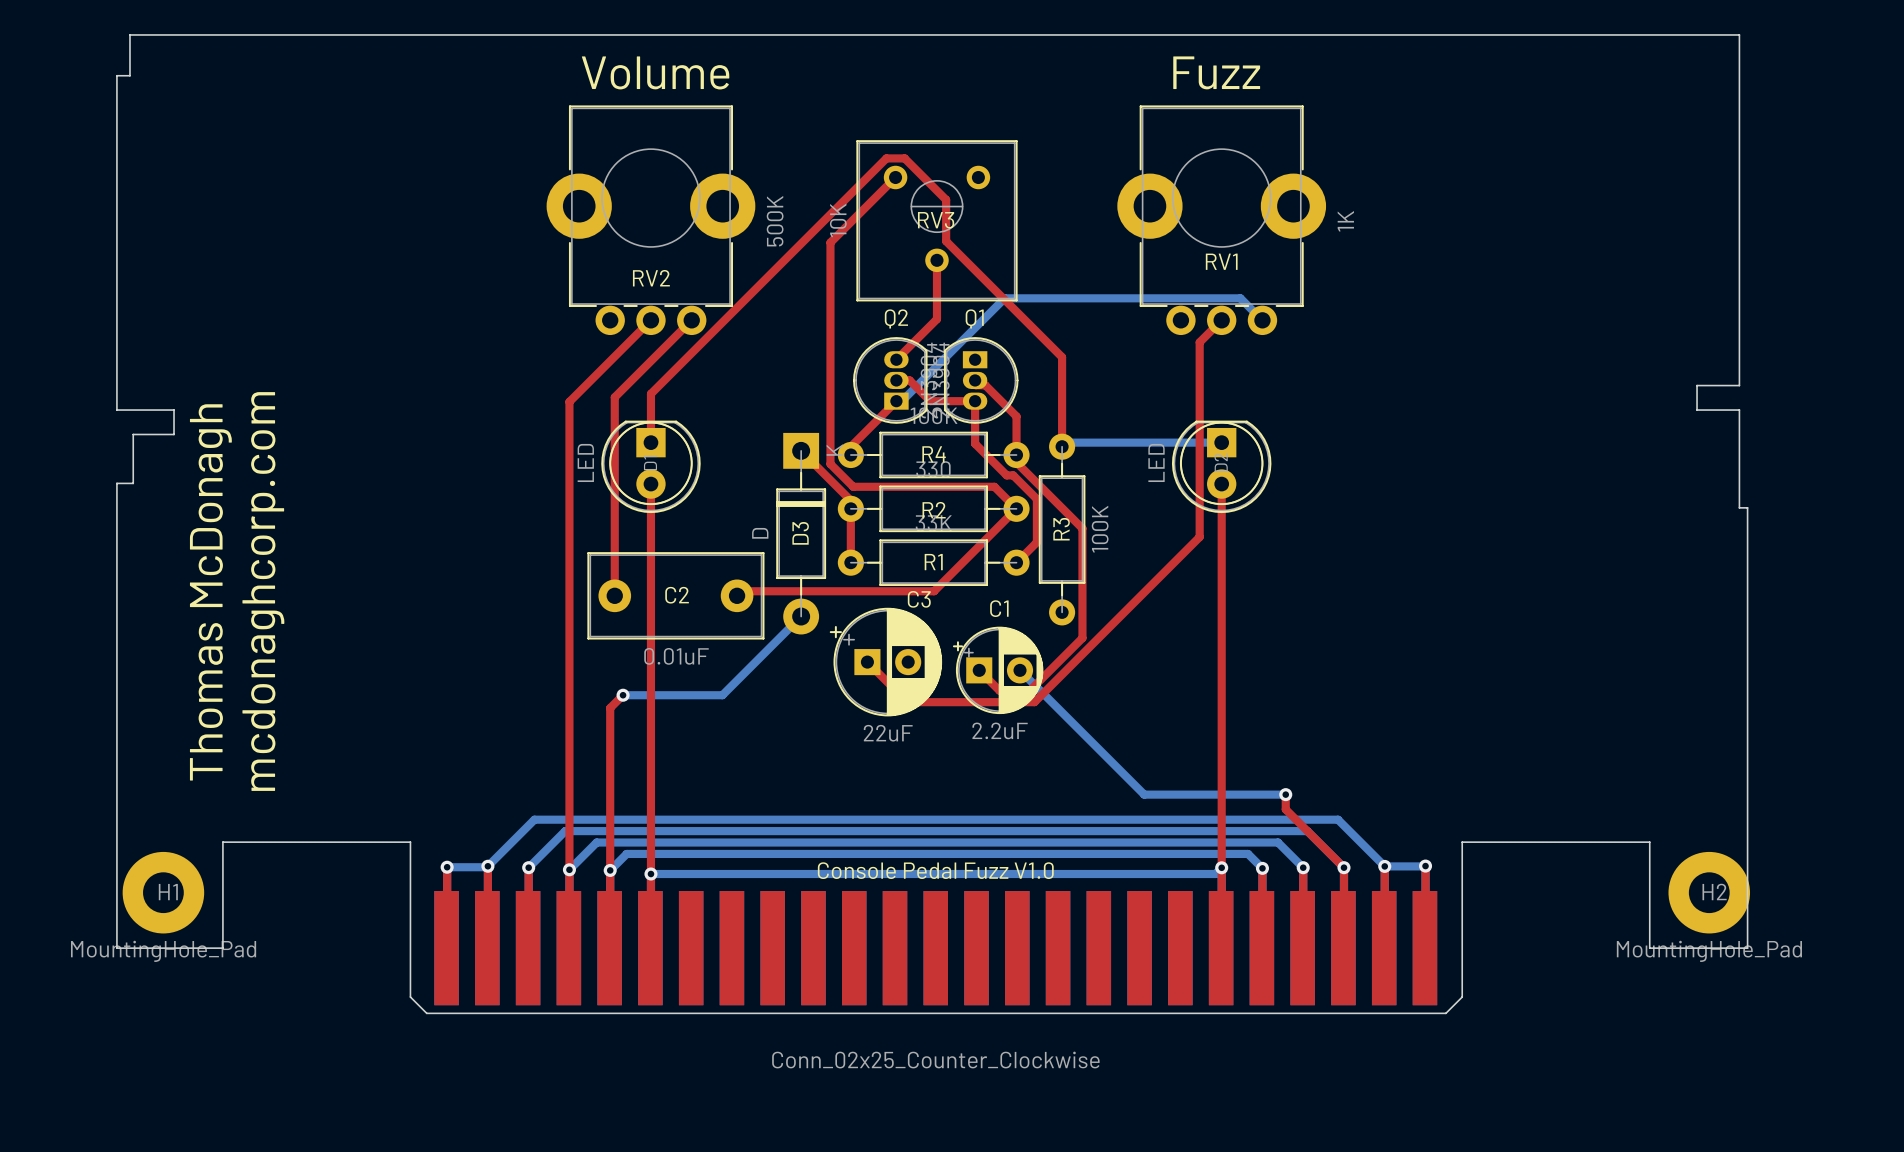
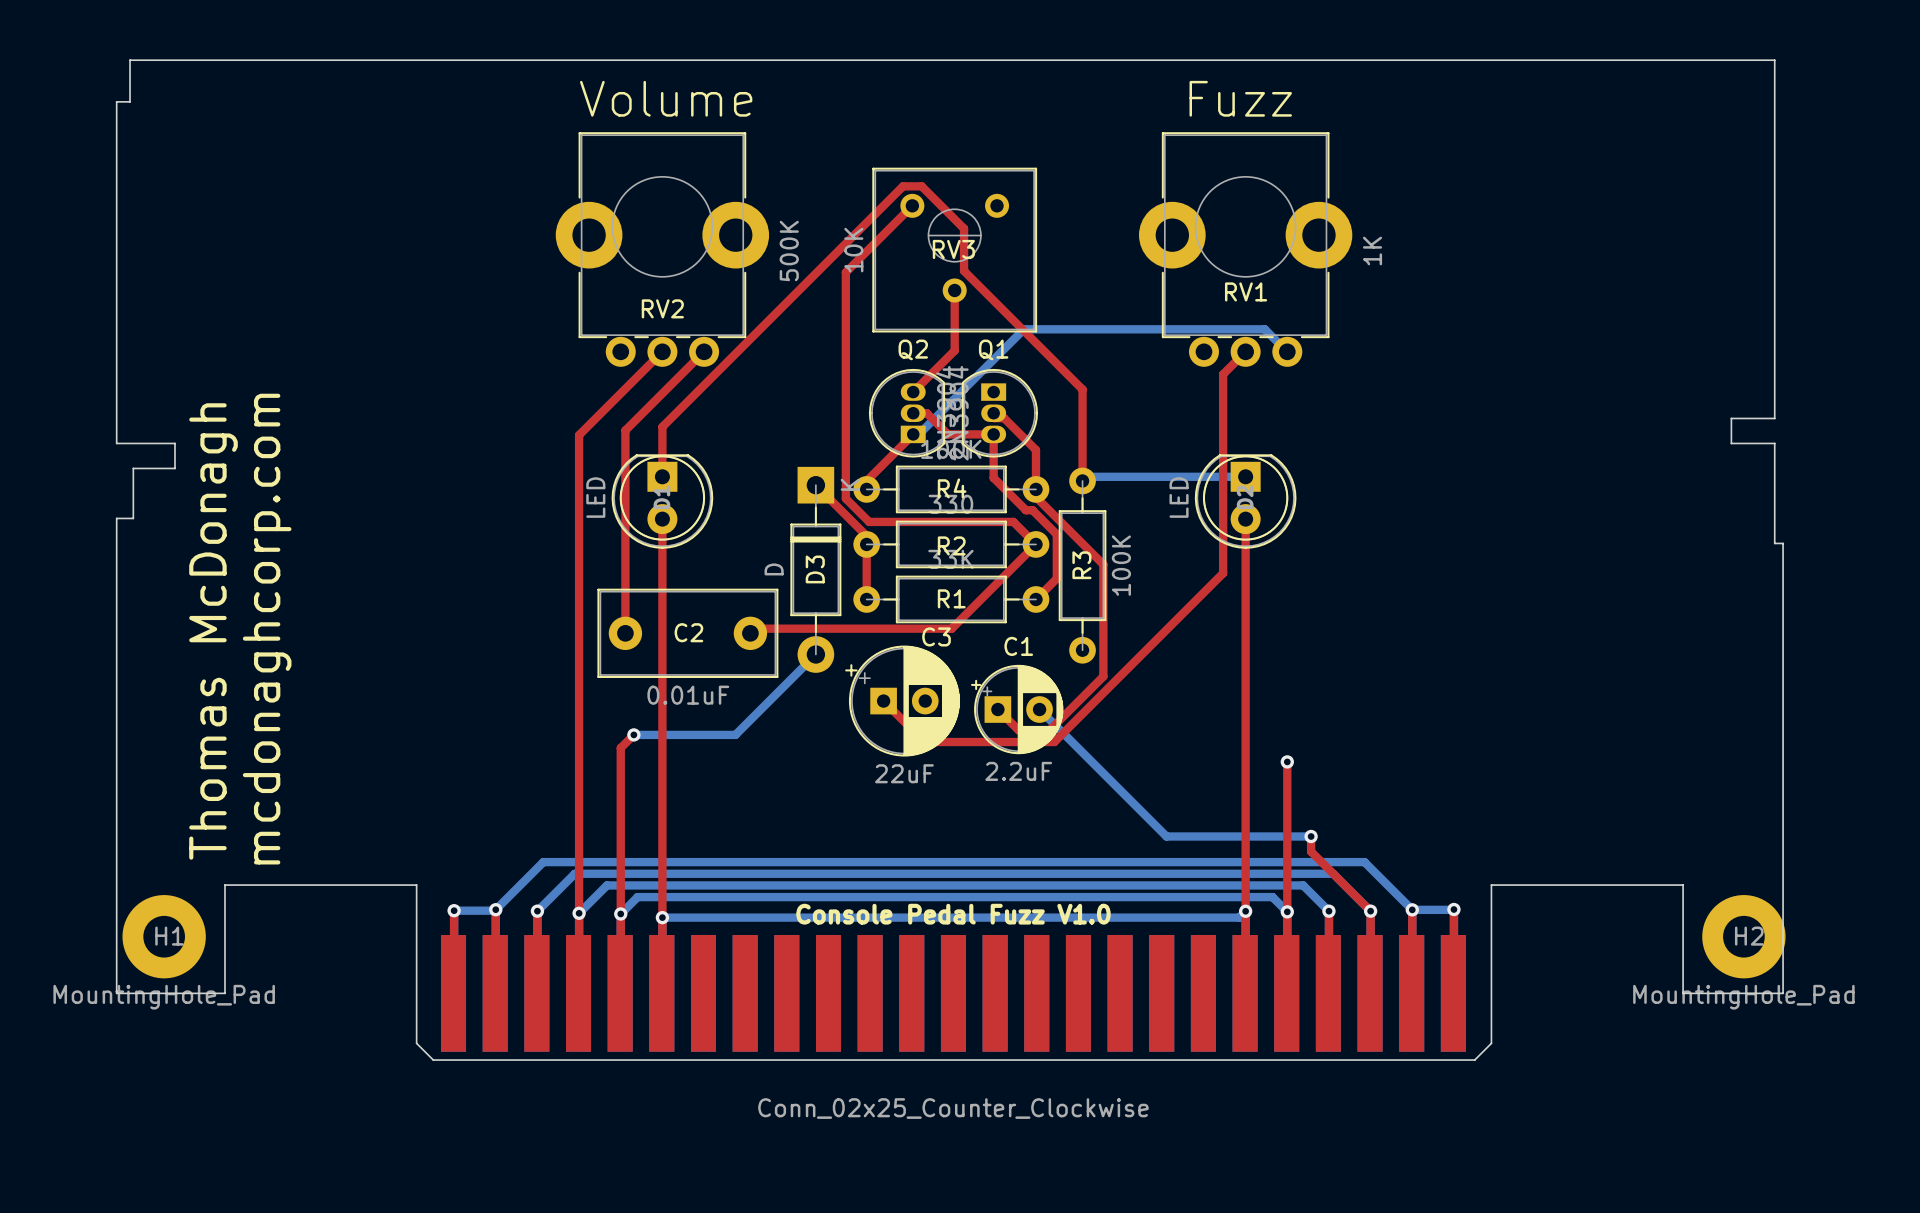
top track: none -> (1287, 761) (1287, 911)
via: none -> (1287, 761)

